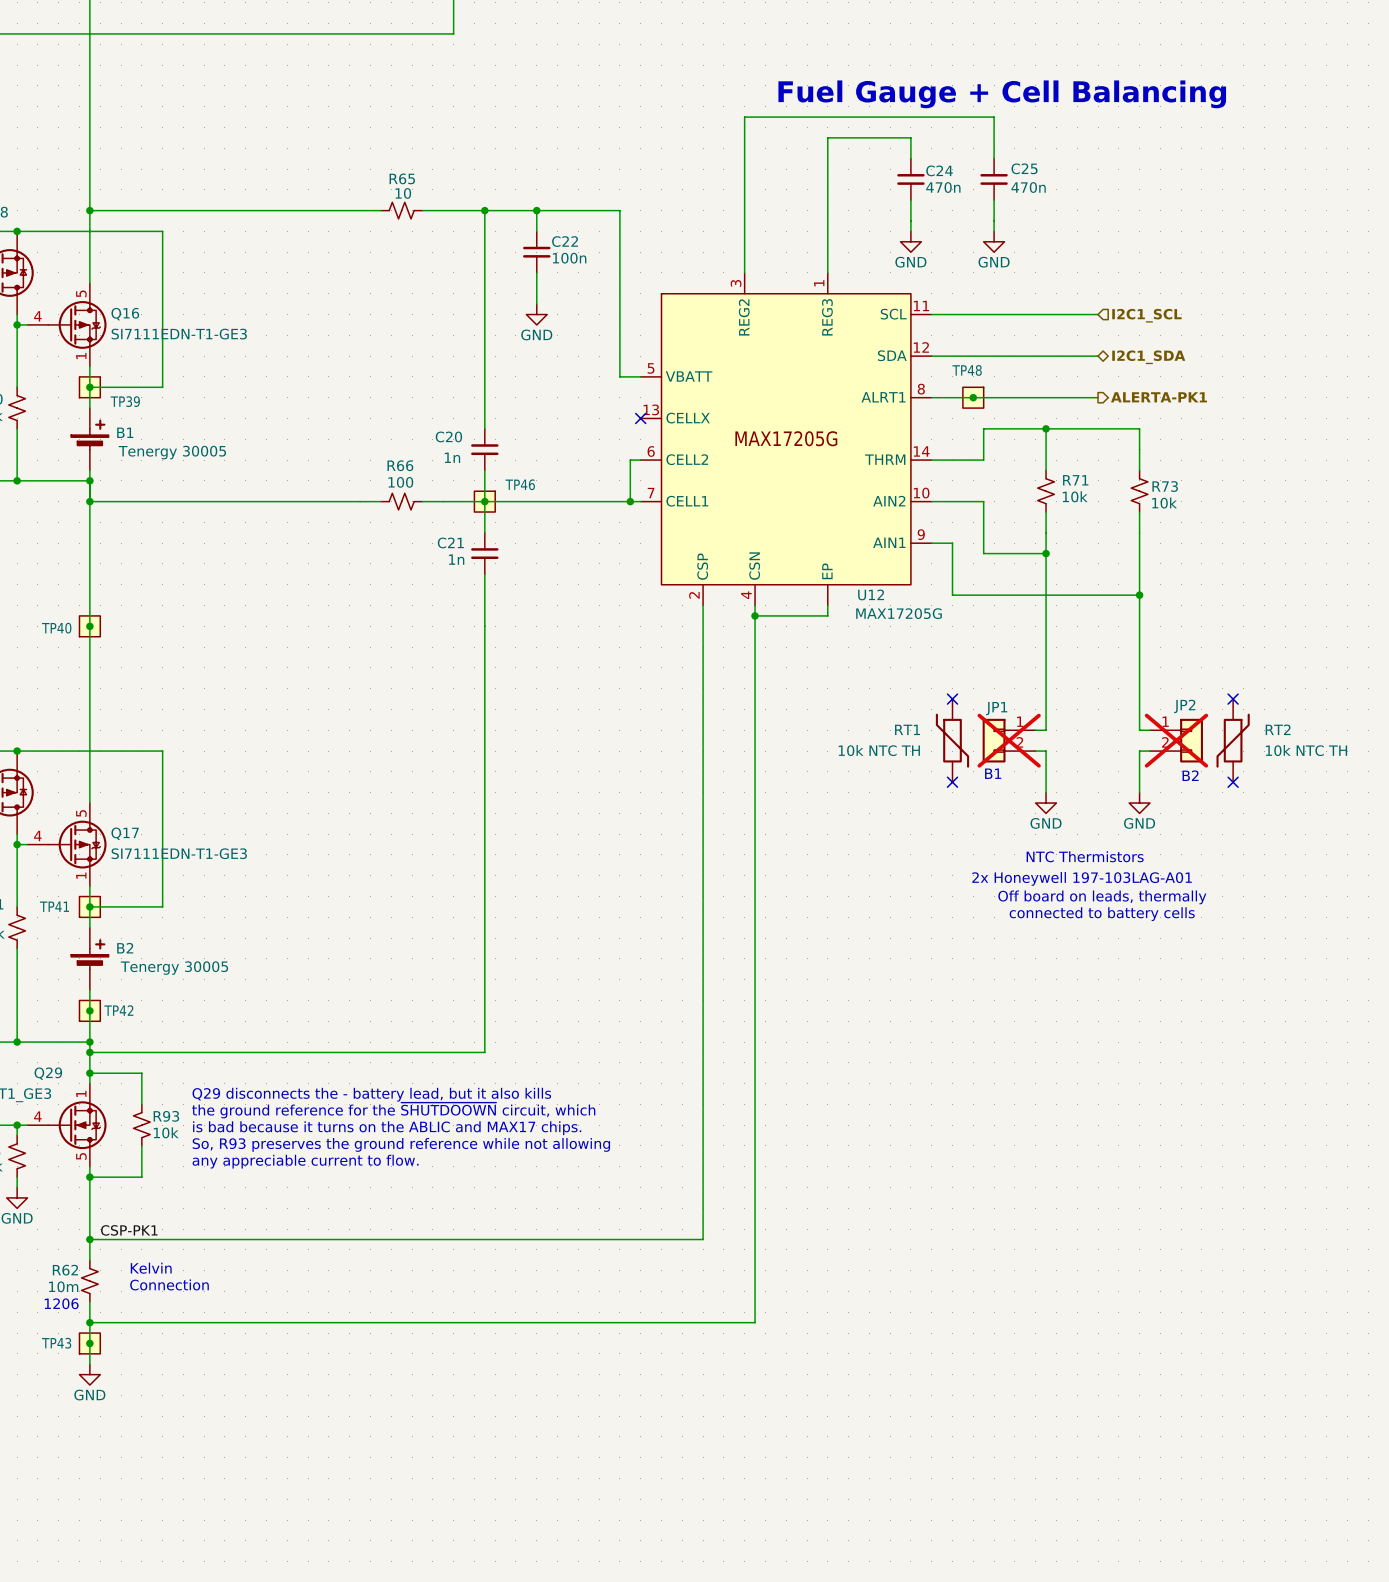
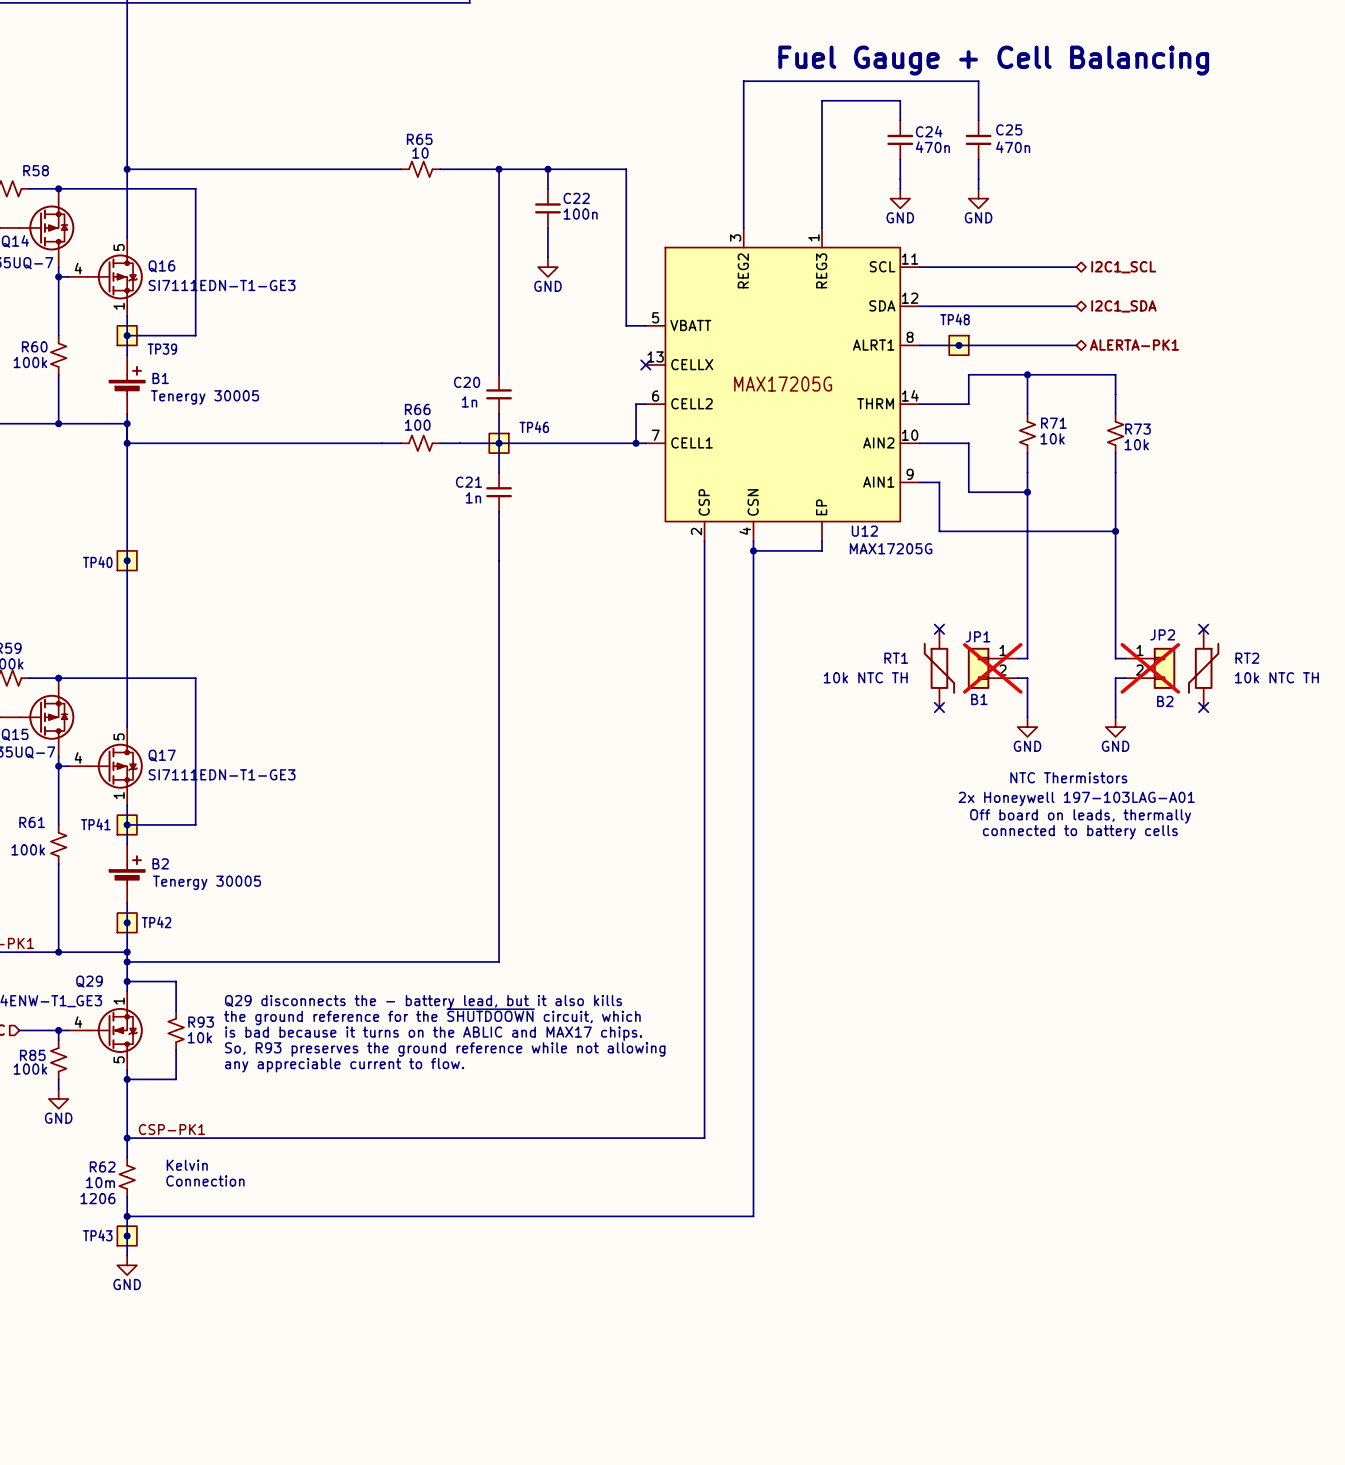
hierarchical label shape: input (1146, 315) -> bidirectional (1123, 267)
hierarchical label shape: output (1158, 397) -> bidirectional (1134, 345)

